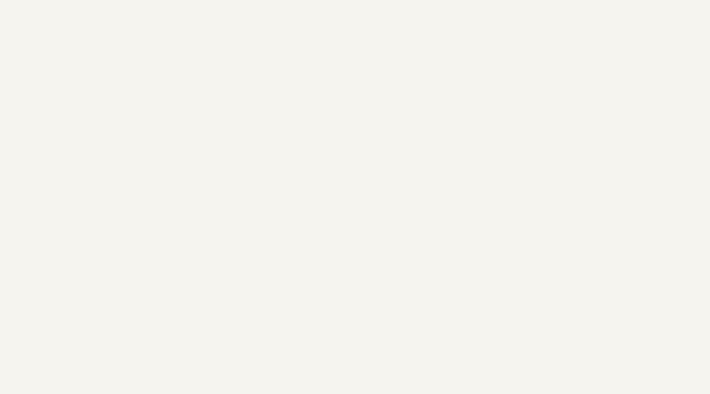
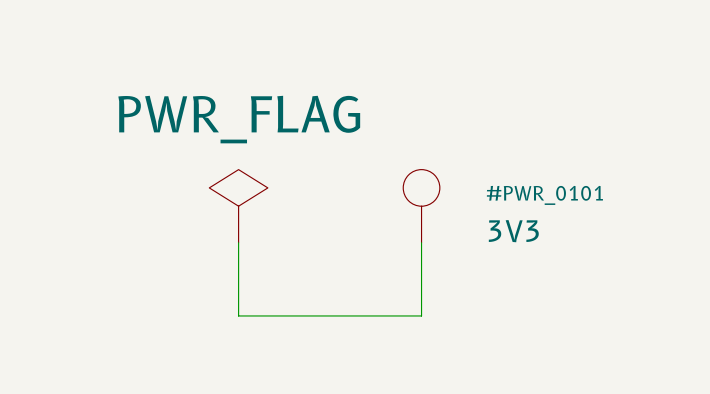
power symbol: none -> PWR_FLAG (238, 206)
#PWR_0101: none -> 3V3 (421, 206)
wire: none -> (238, 242) (238, 315) (421, 315) (421, 242)

